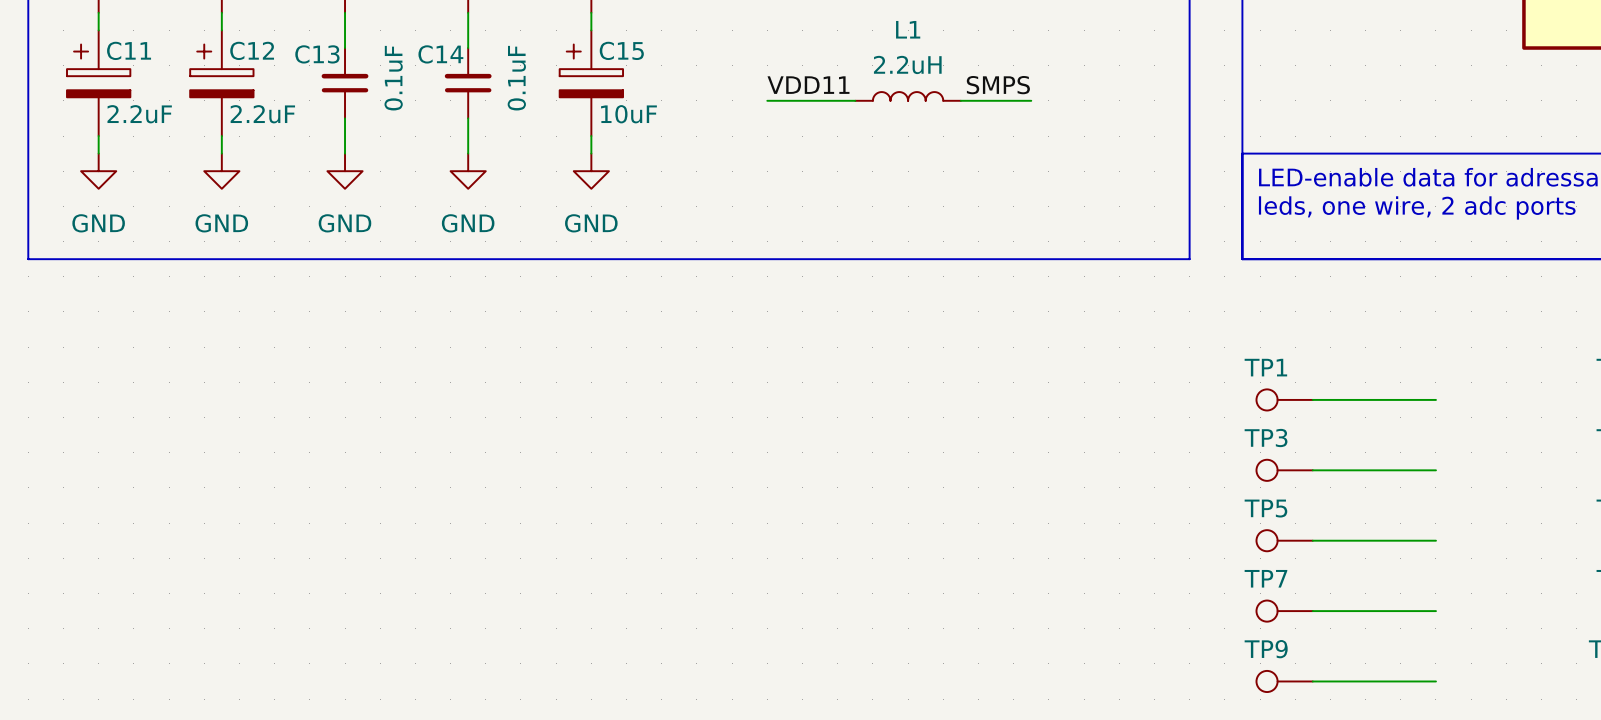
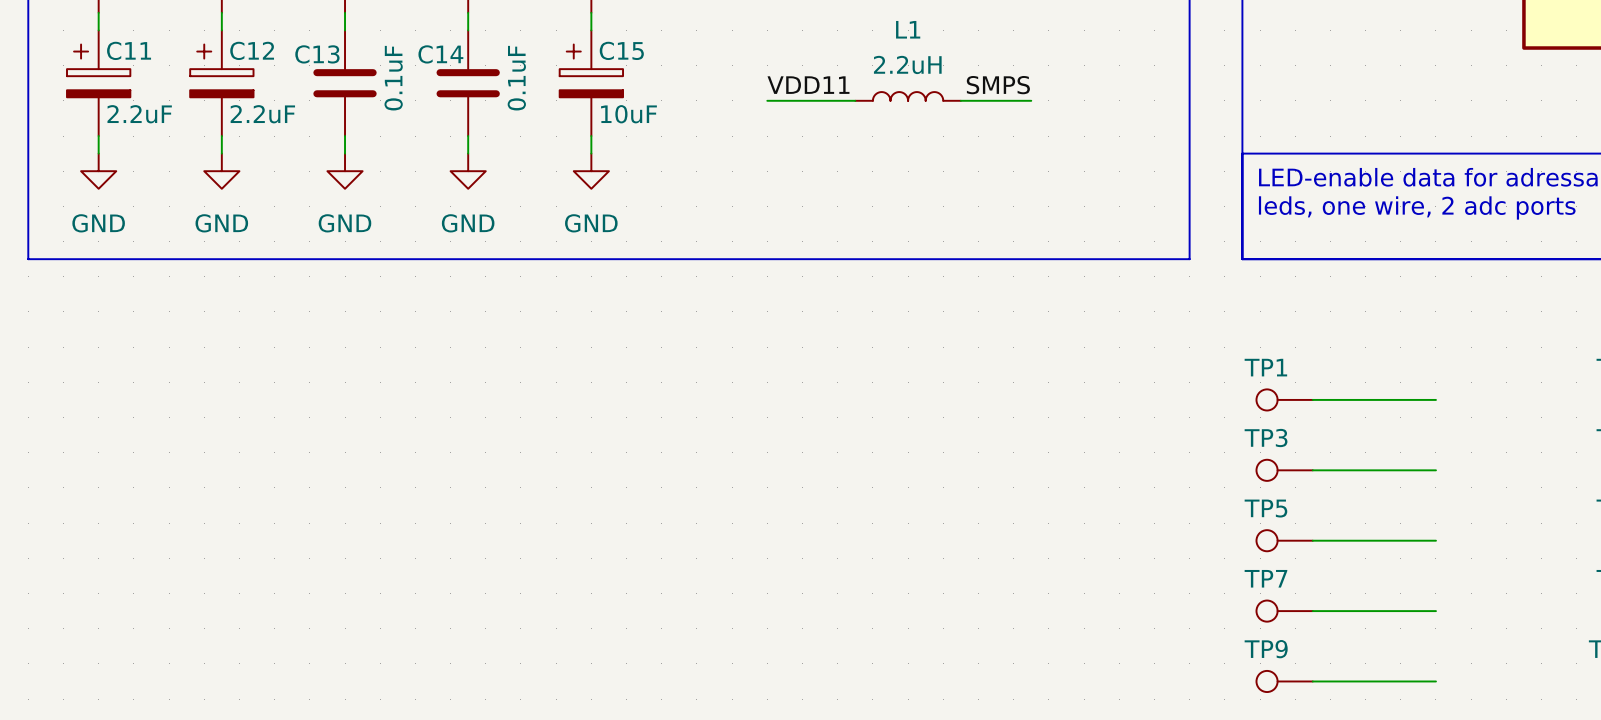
C13 symbol: [321, 48, 369, 119] -> [313, 30, 377, 137]
C14 symbol: [444, 48, 492, 119] -> [436, 30, 500, 137]

